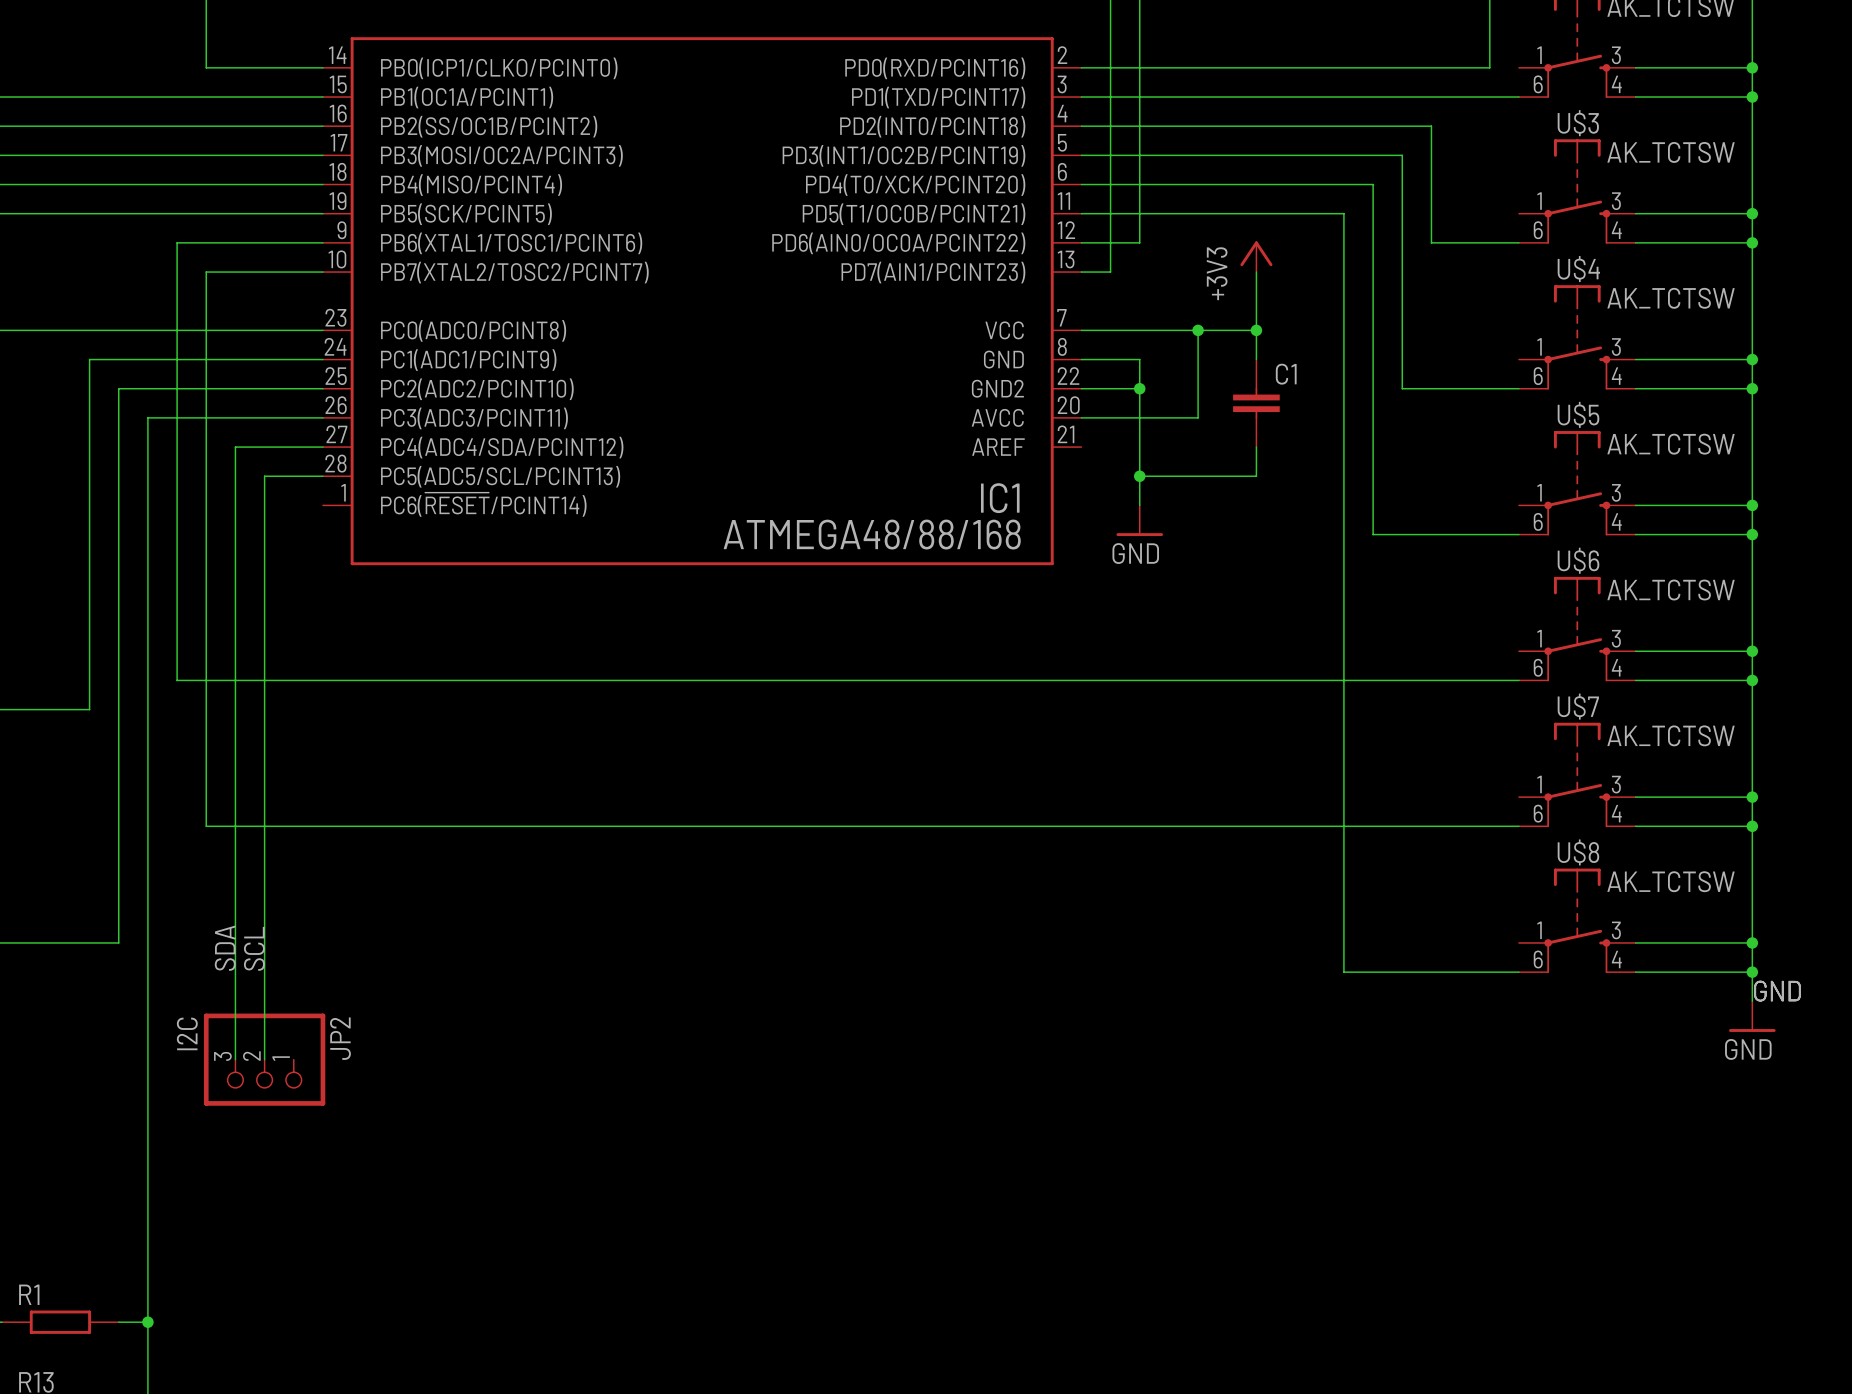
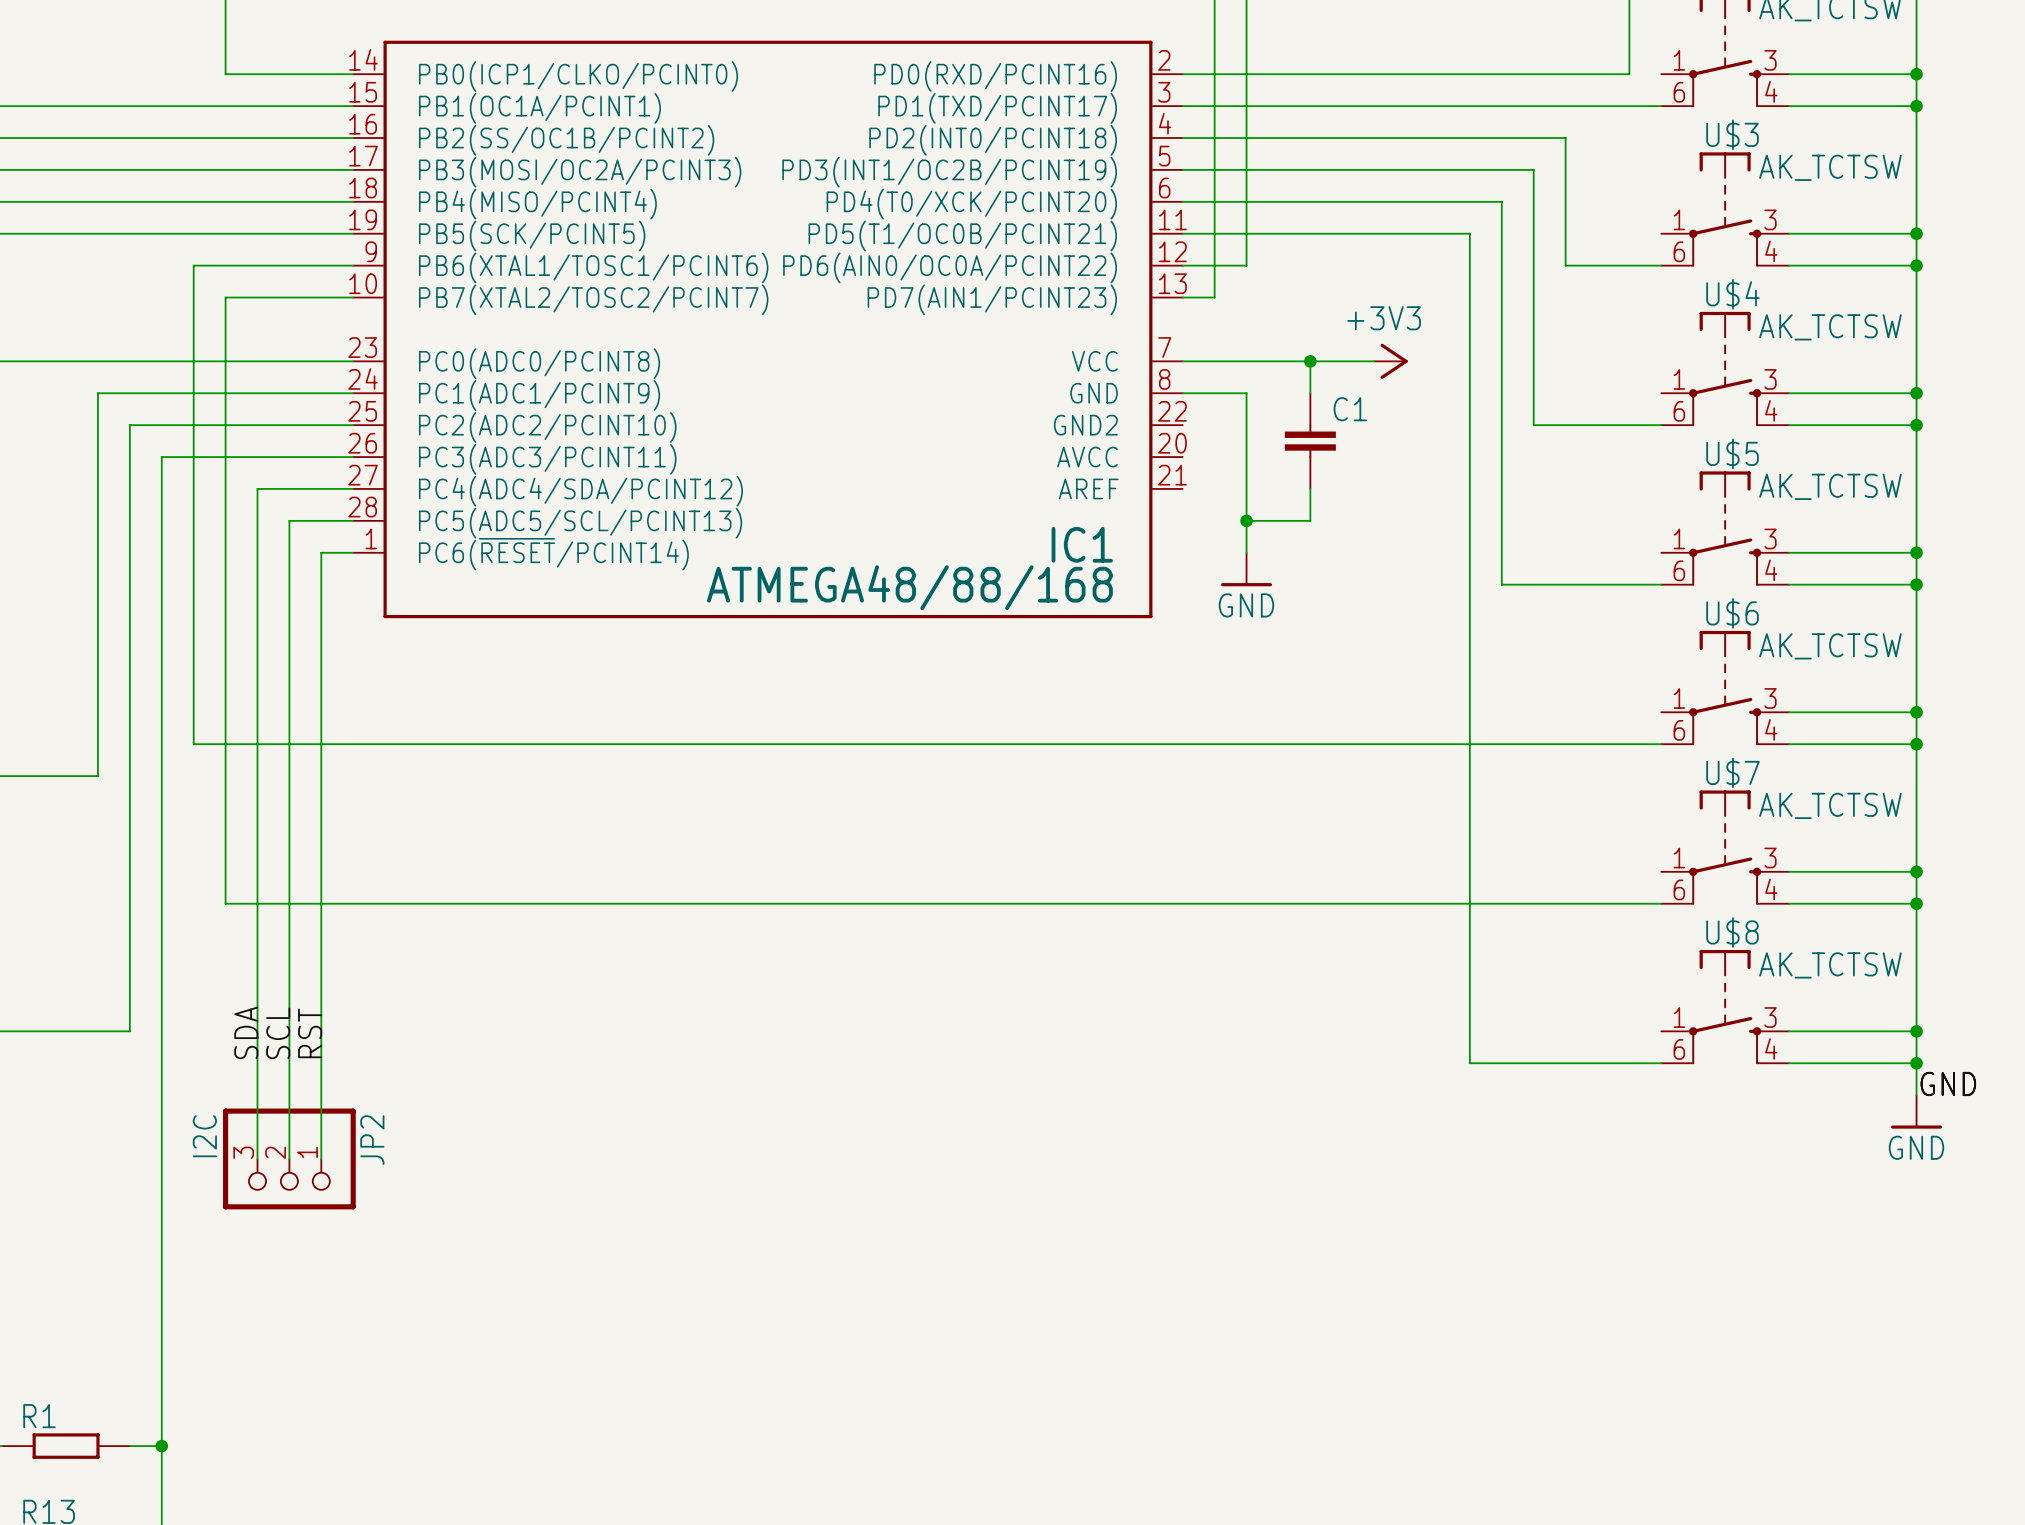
power symbol rotation: 0° (1256, 253) -> 90° clockwise (1394, 361)
power symbol position: +3V3 (1256, 256) -> +3V3 (1390, 361)
wire: (1256, 272) (1256, 359) -> none
junction: (1256, 330) -> none
wire: (1198, 359) (1198, 417) (1081, 417) -> none
wire: (1081, 388) (1139, 388) -> none
junction: (1139, 388) -> none
C1 position: (1256, 403) -> (1310, 441)
wire: (1256, 447) (1256, 476) (1198, 476) -> (1310, 488) (1310, 520)
wire: none -> (353, 552) (321, 552) (321, 1158)
label: none -> RST (310, 1033)

